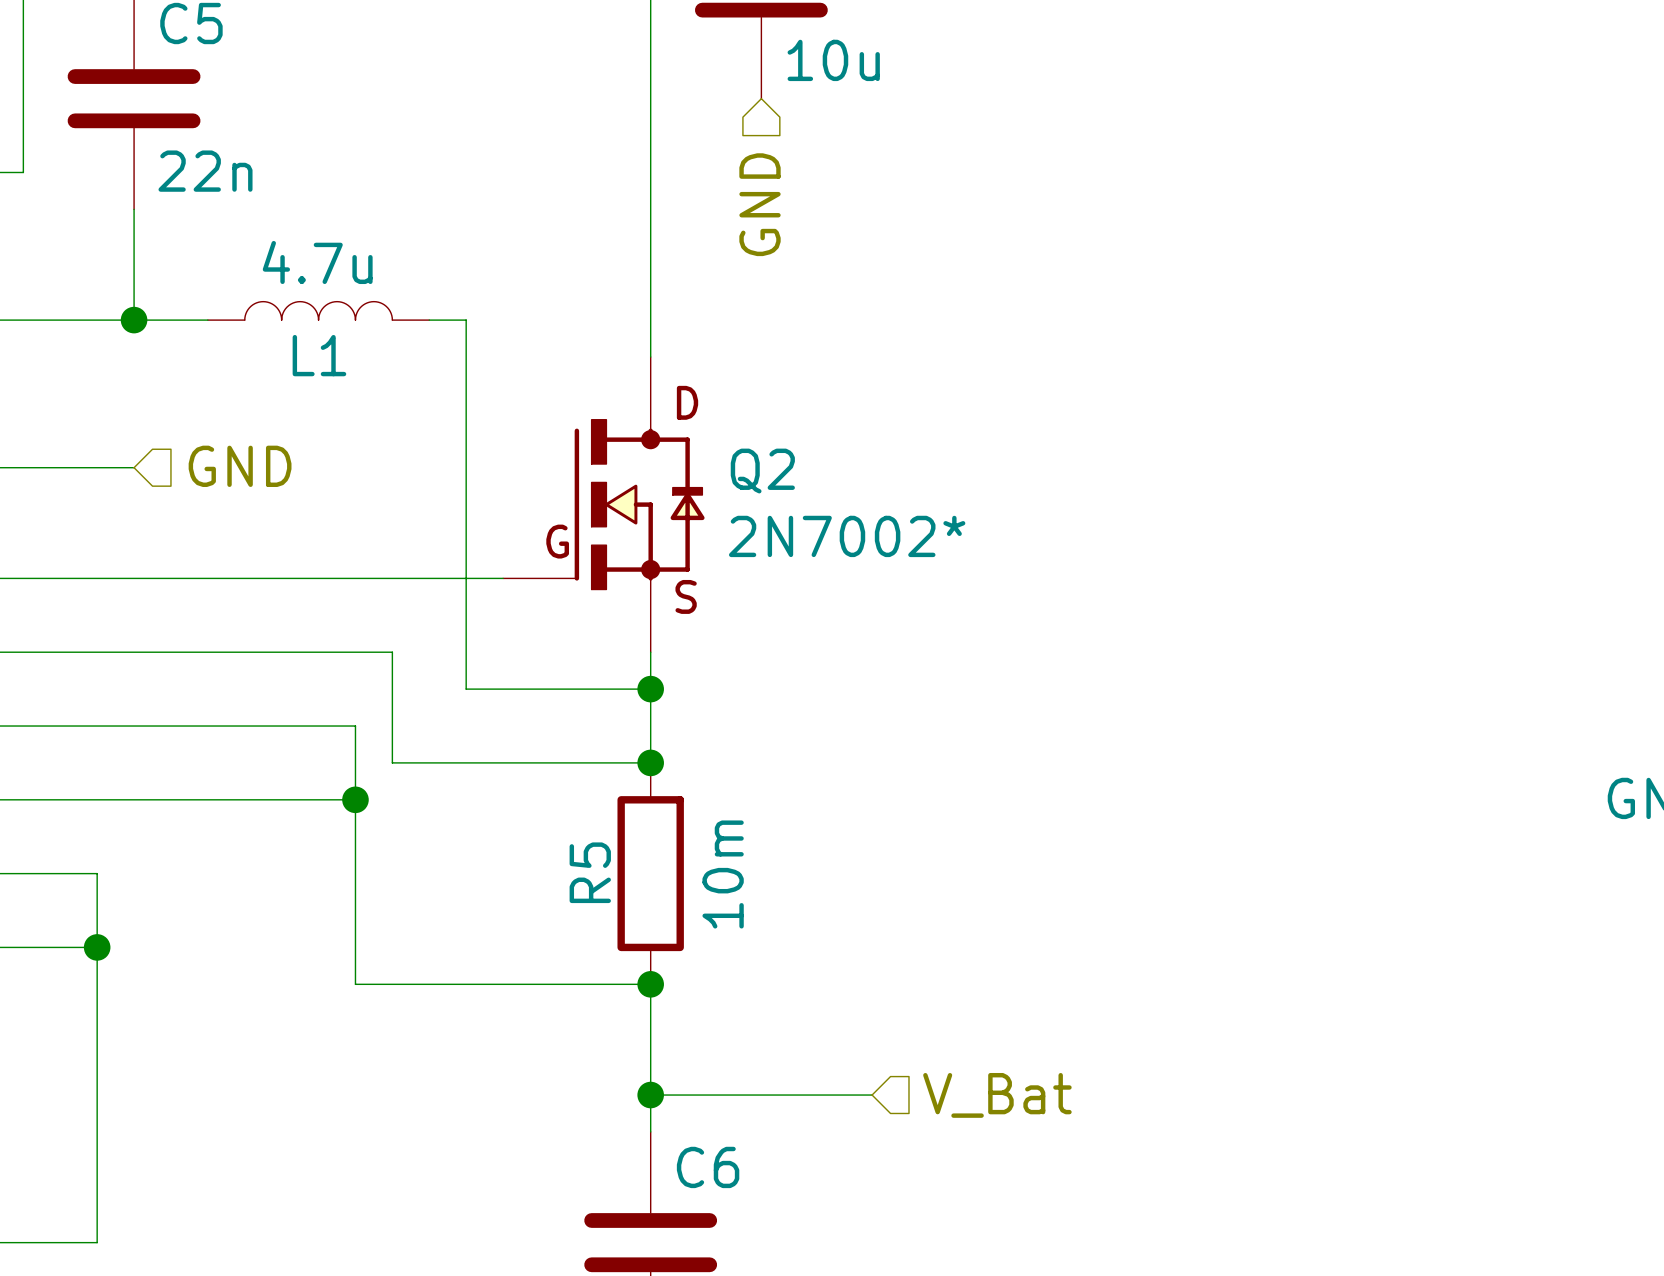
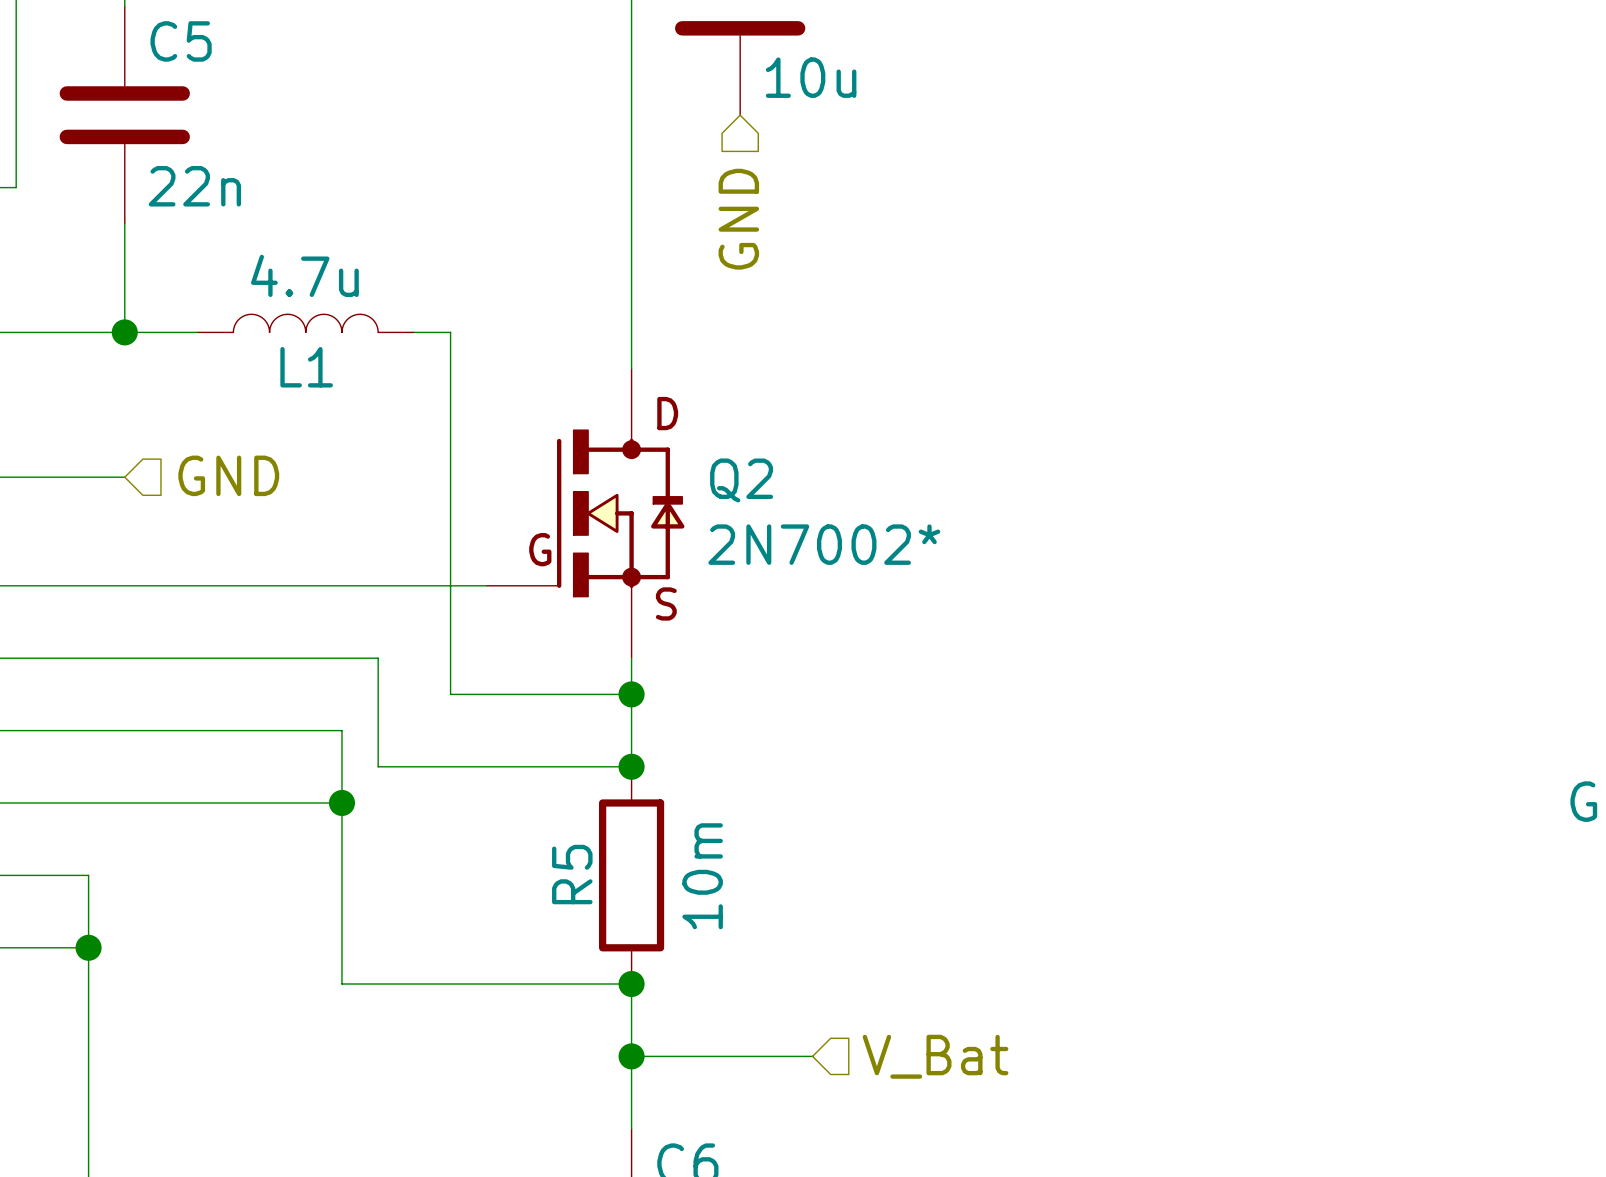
wire: none -> (631, 1056) (812, 1056)
wire: (650, 1095) (872, 1095) -> none
junction position: (650, 1095) -> (631, 1056)
hierarchical label position: V_Bat (997, 1095) -> V_Bat (935, 1056)

